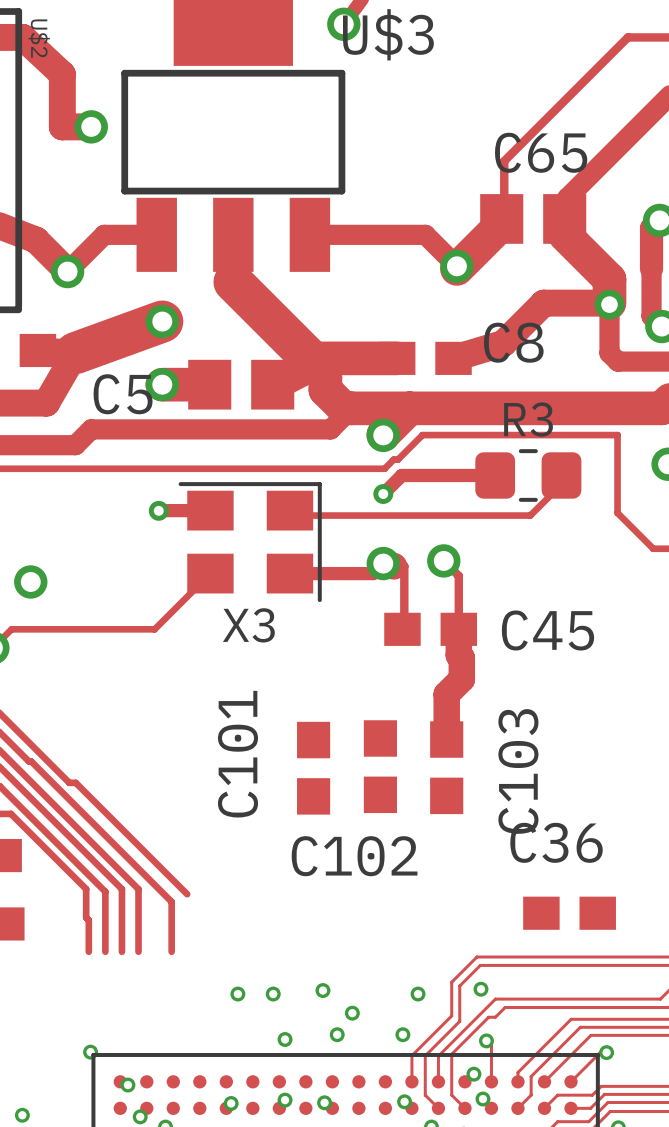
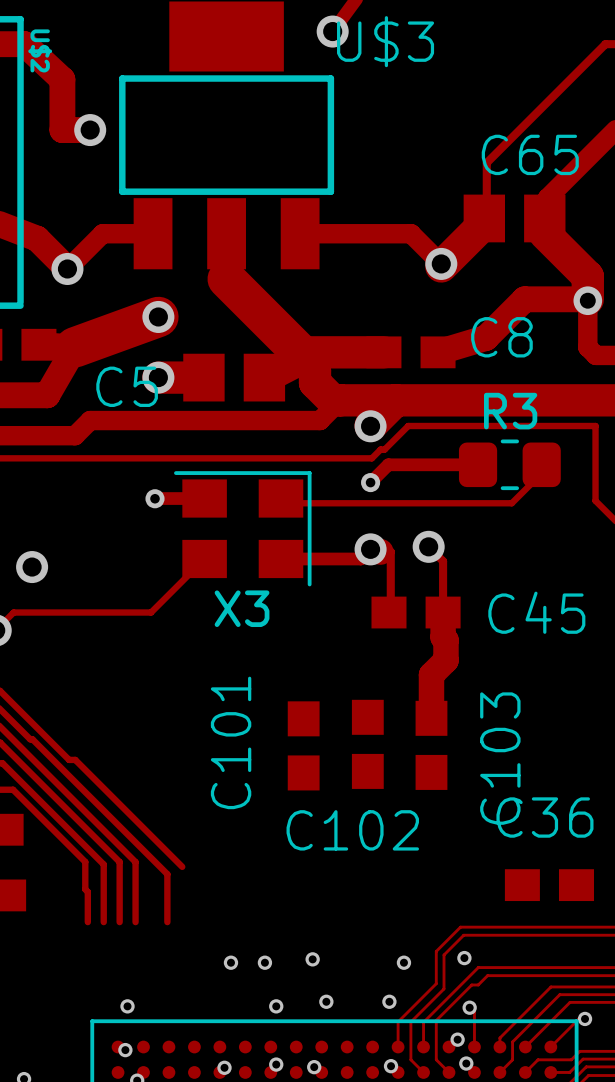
via: (352, 1013) -> none
via position: (90, 1052) -> (127, 1006)

